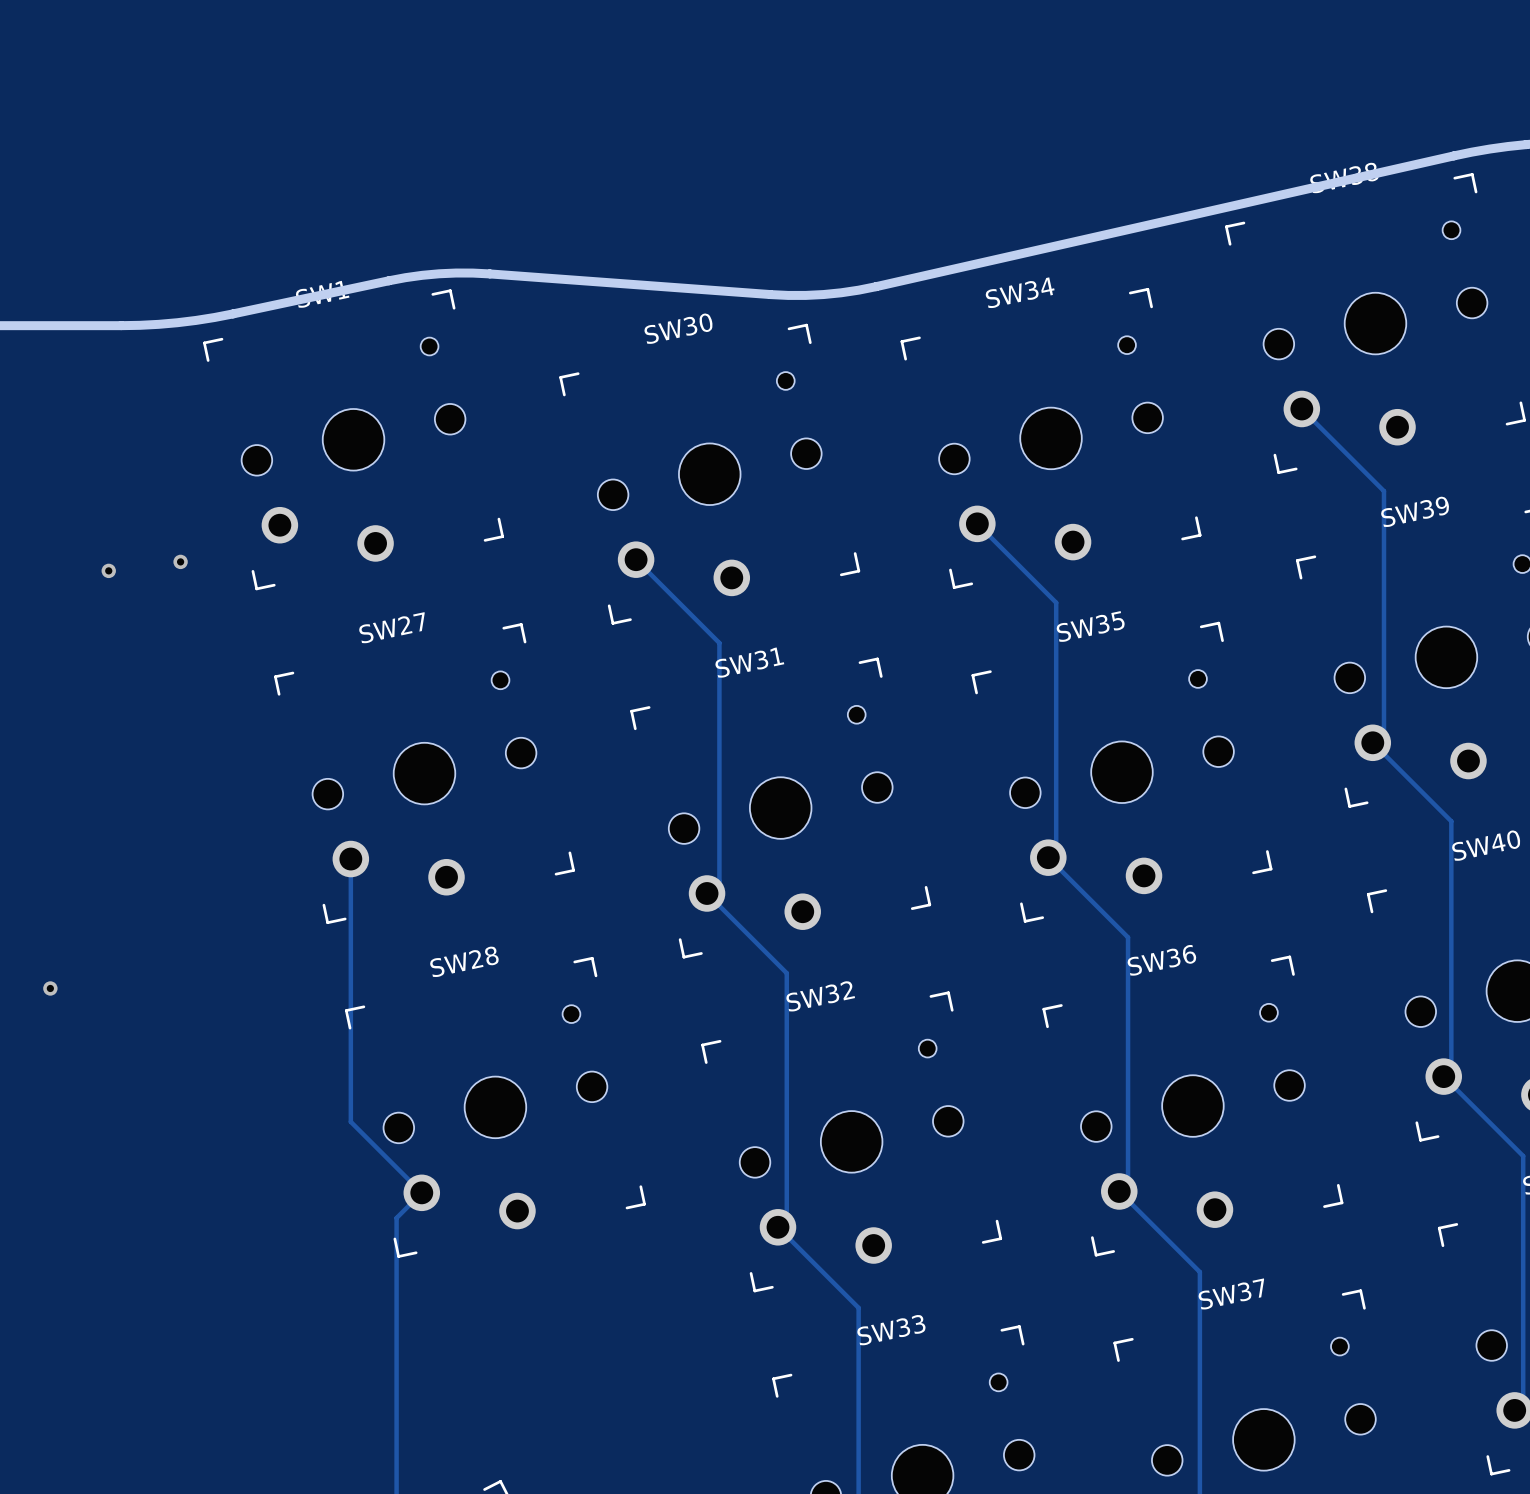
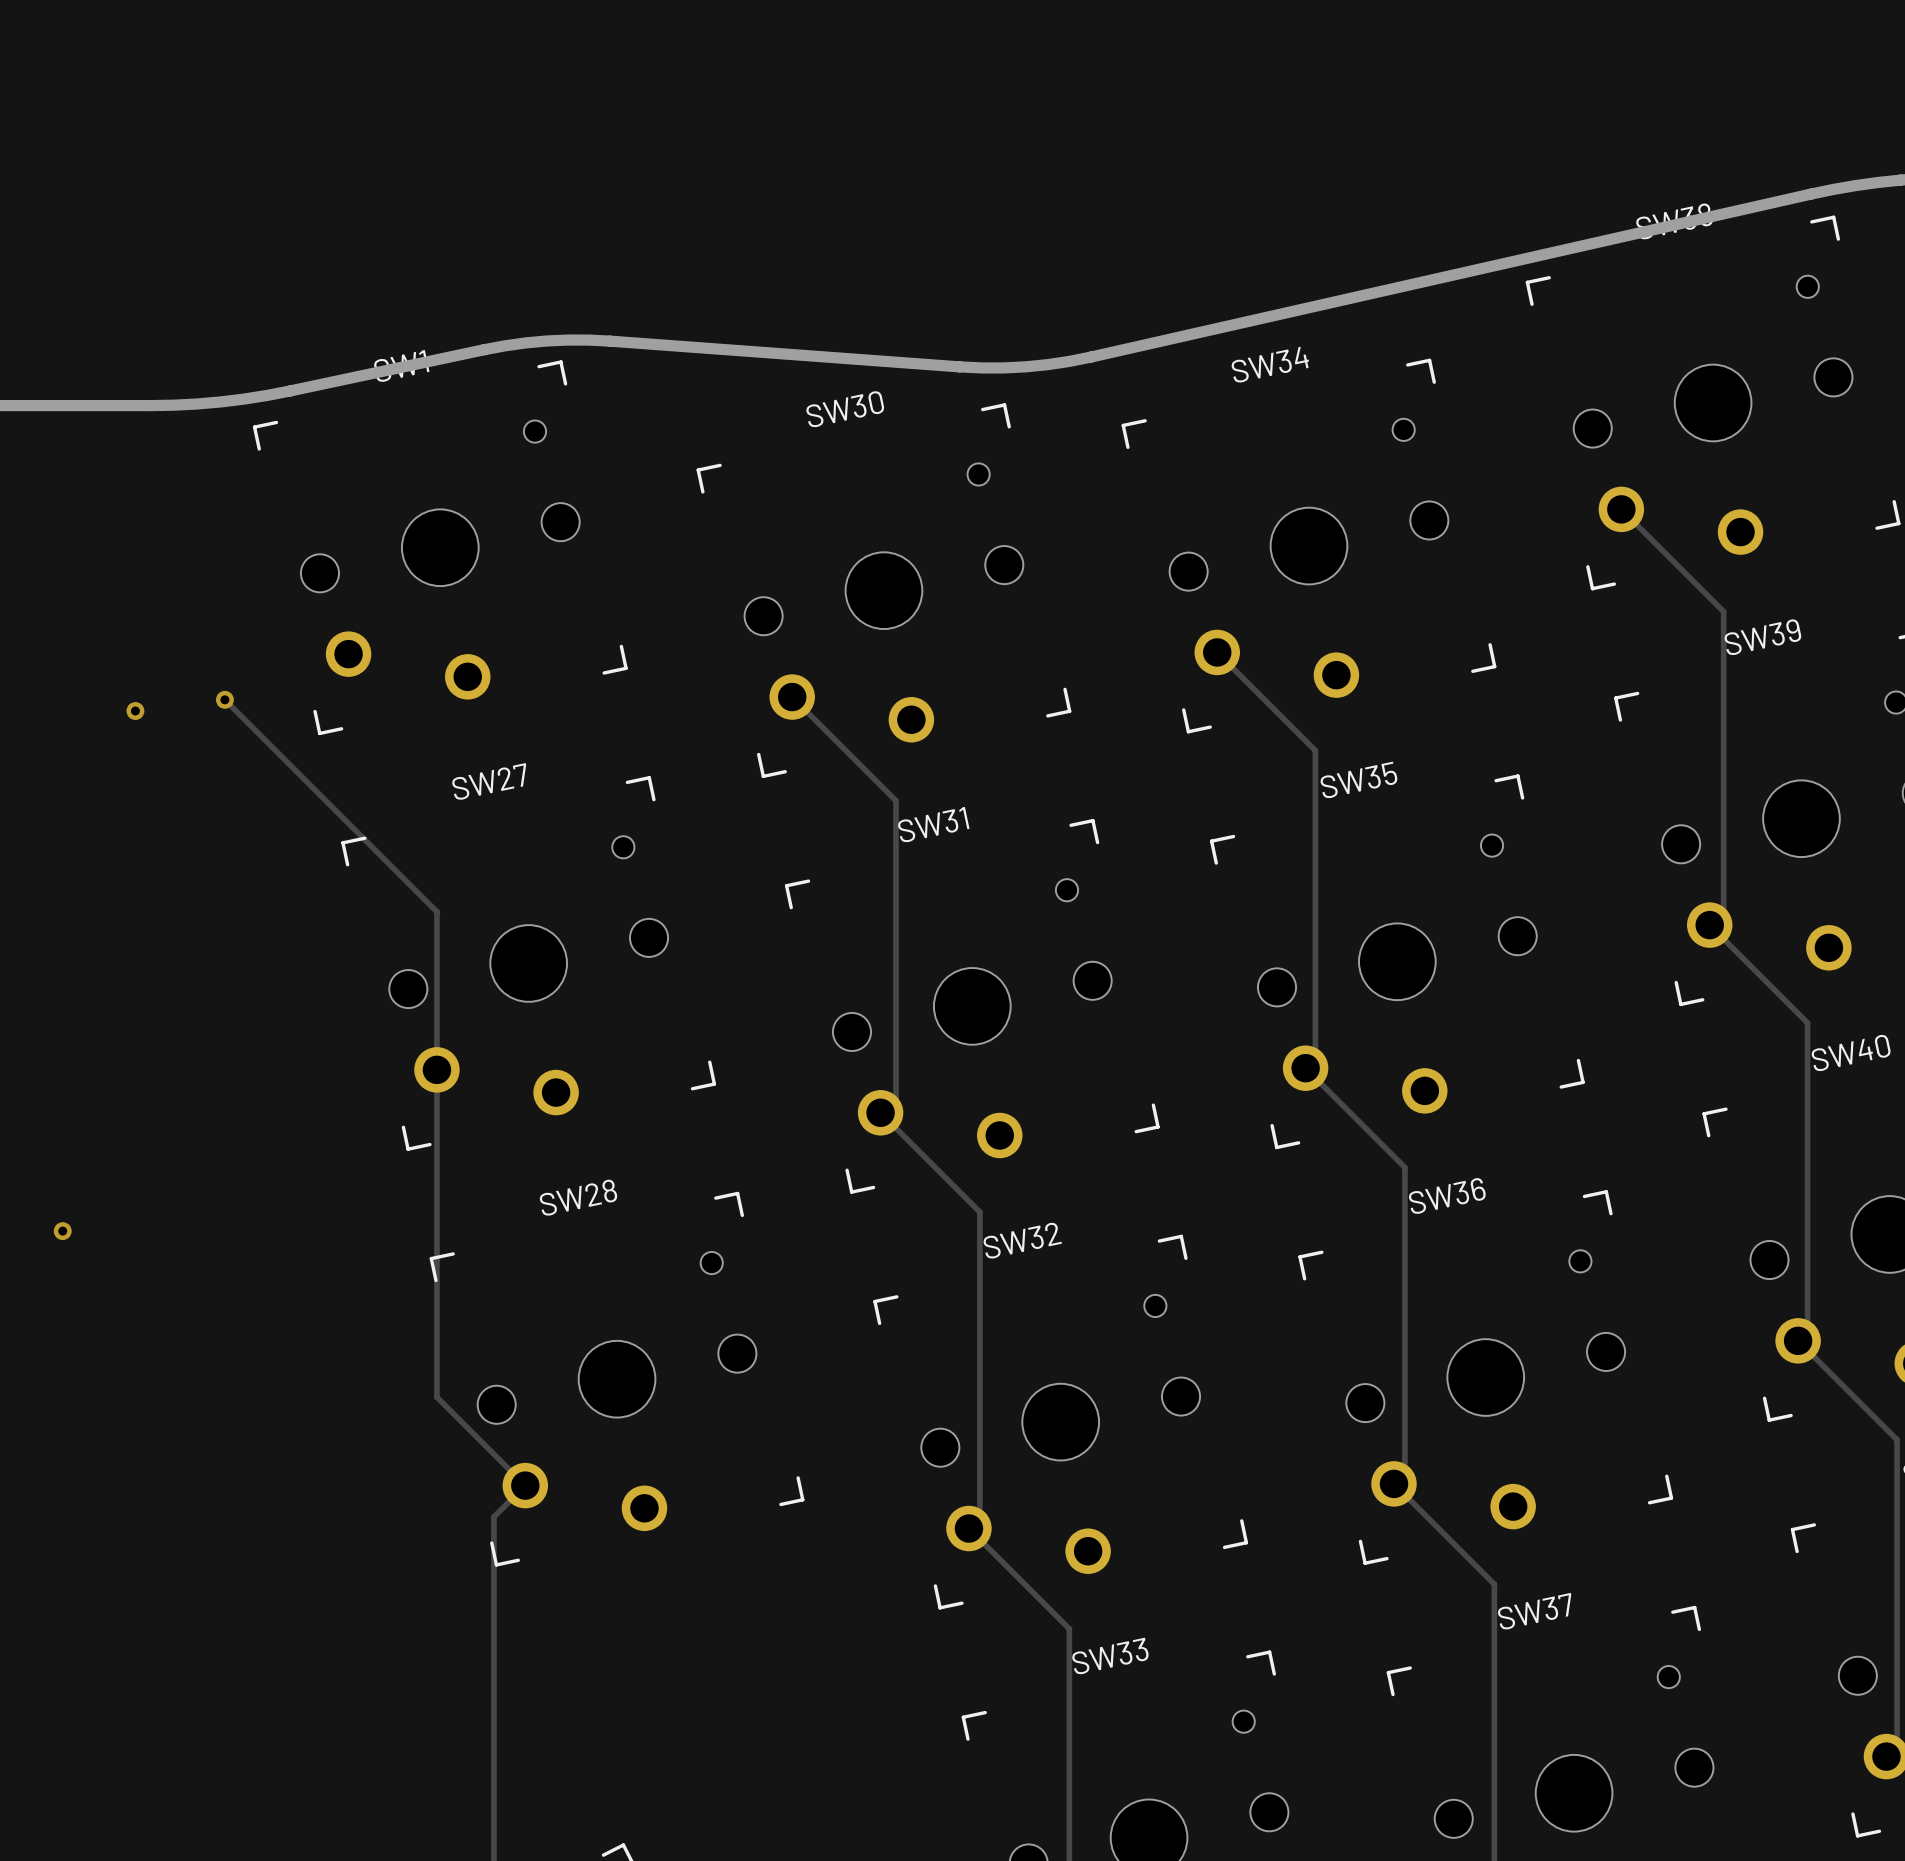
track: none -> (224, 699) (437, 912) (436, 1069)

